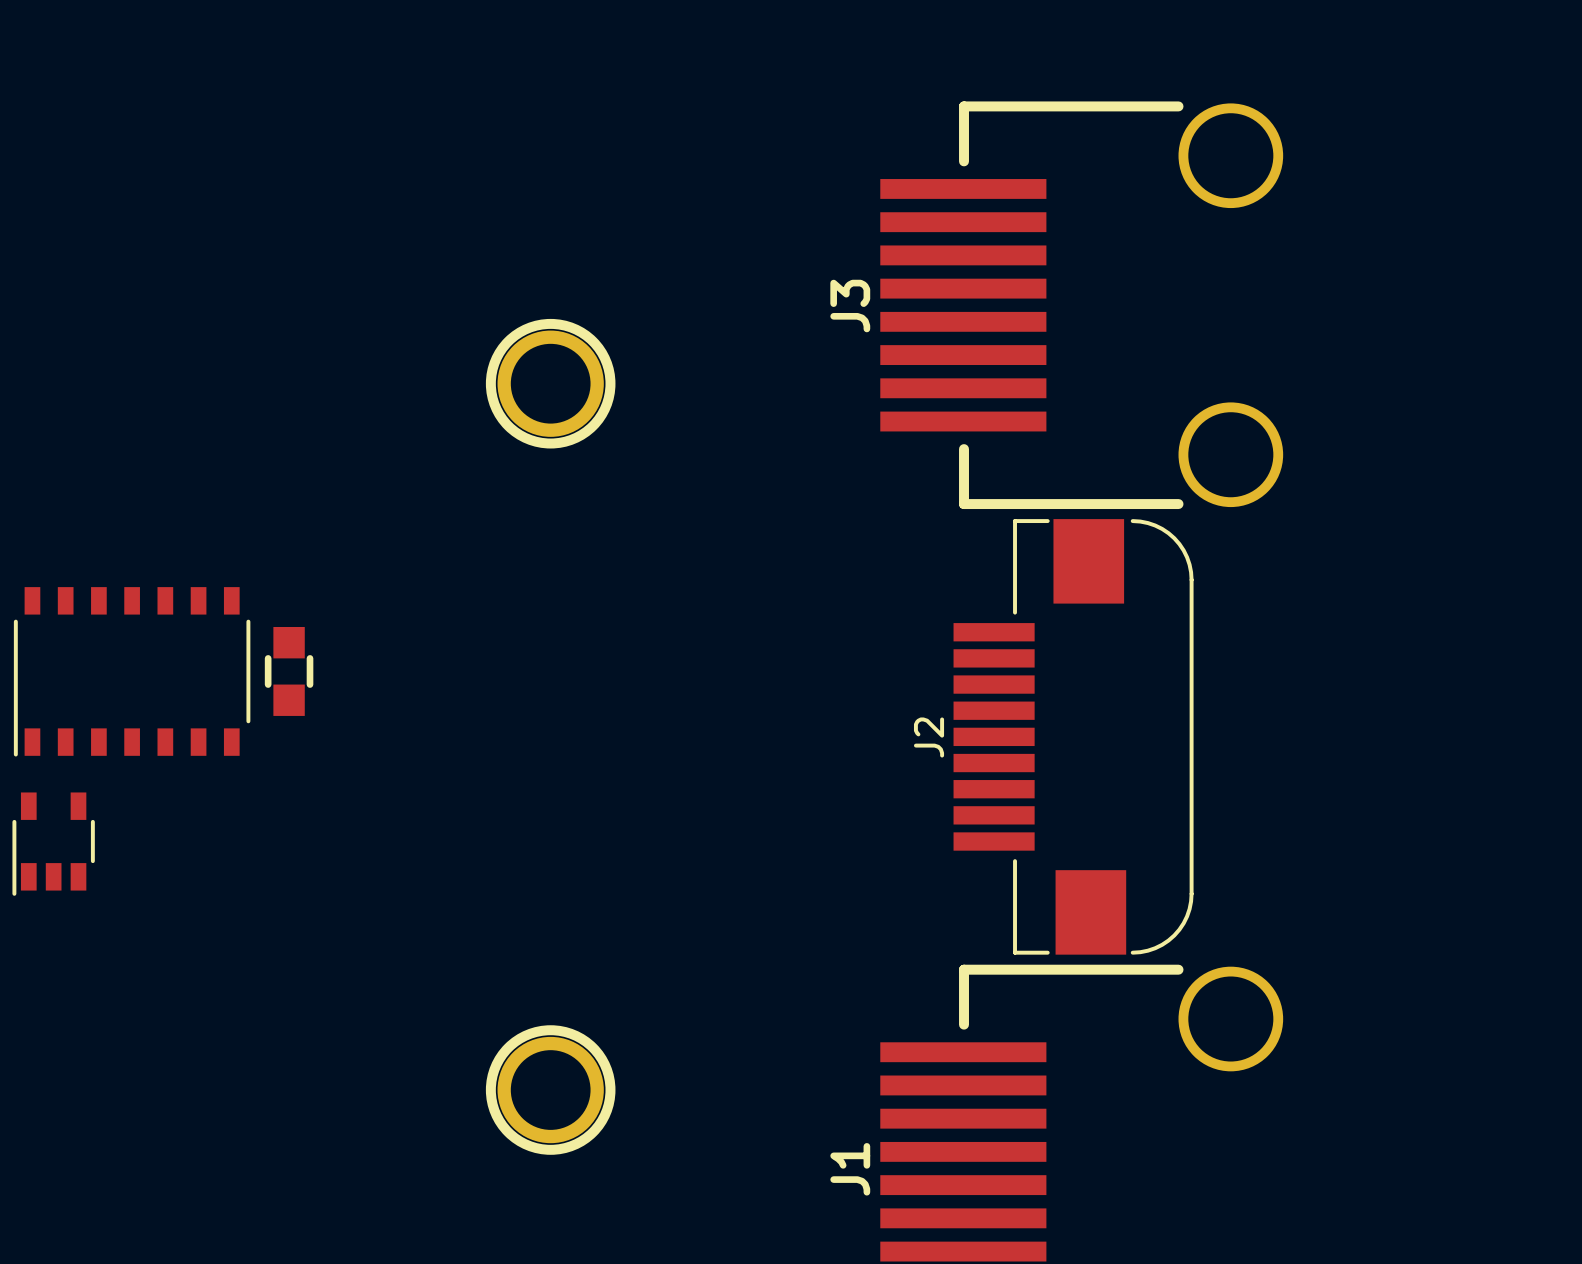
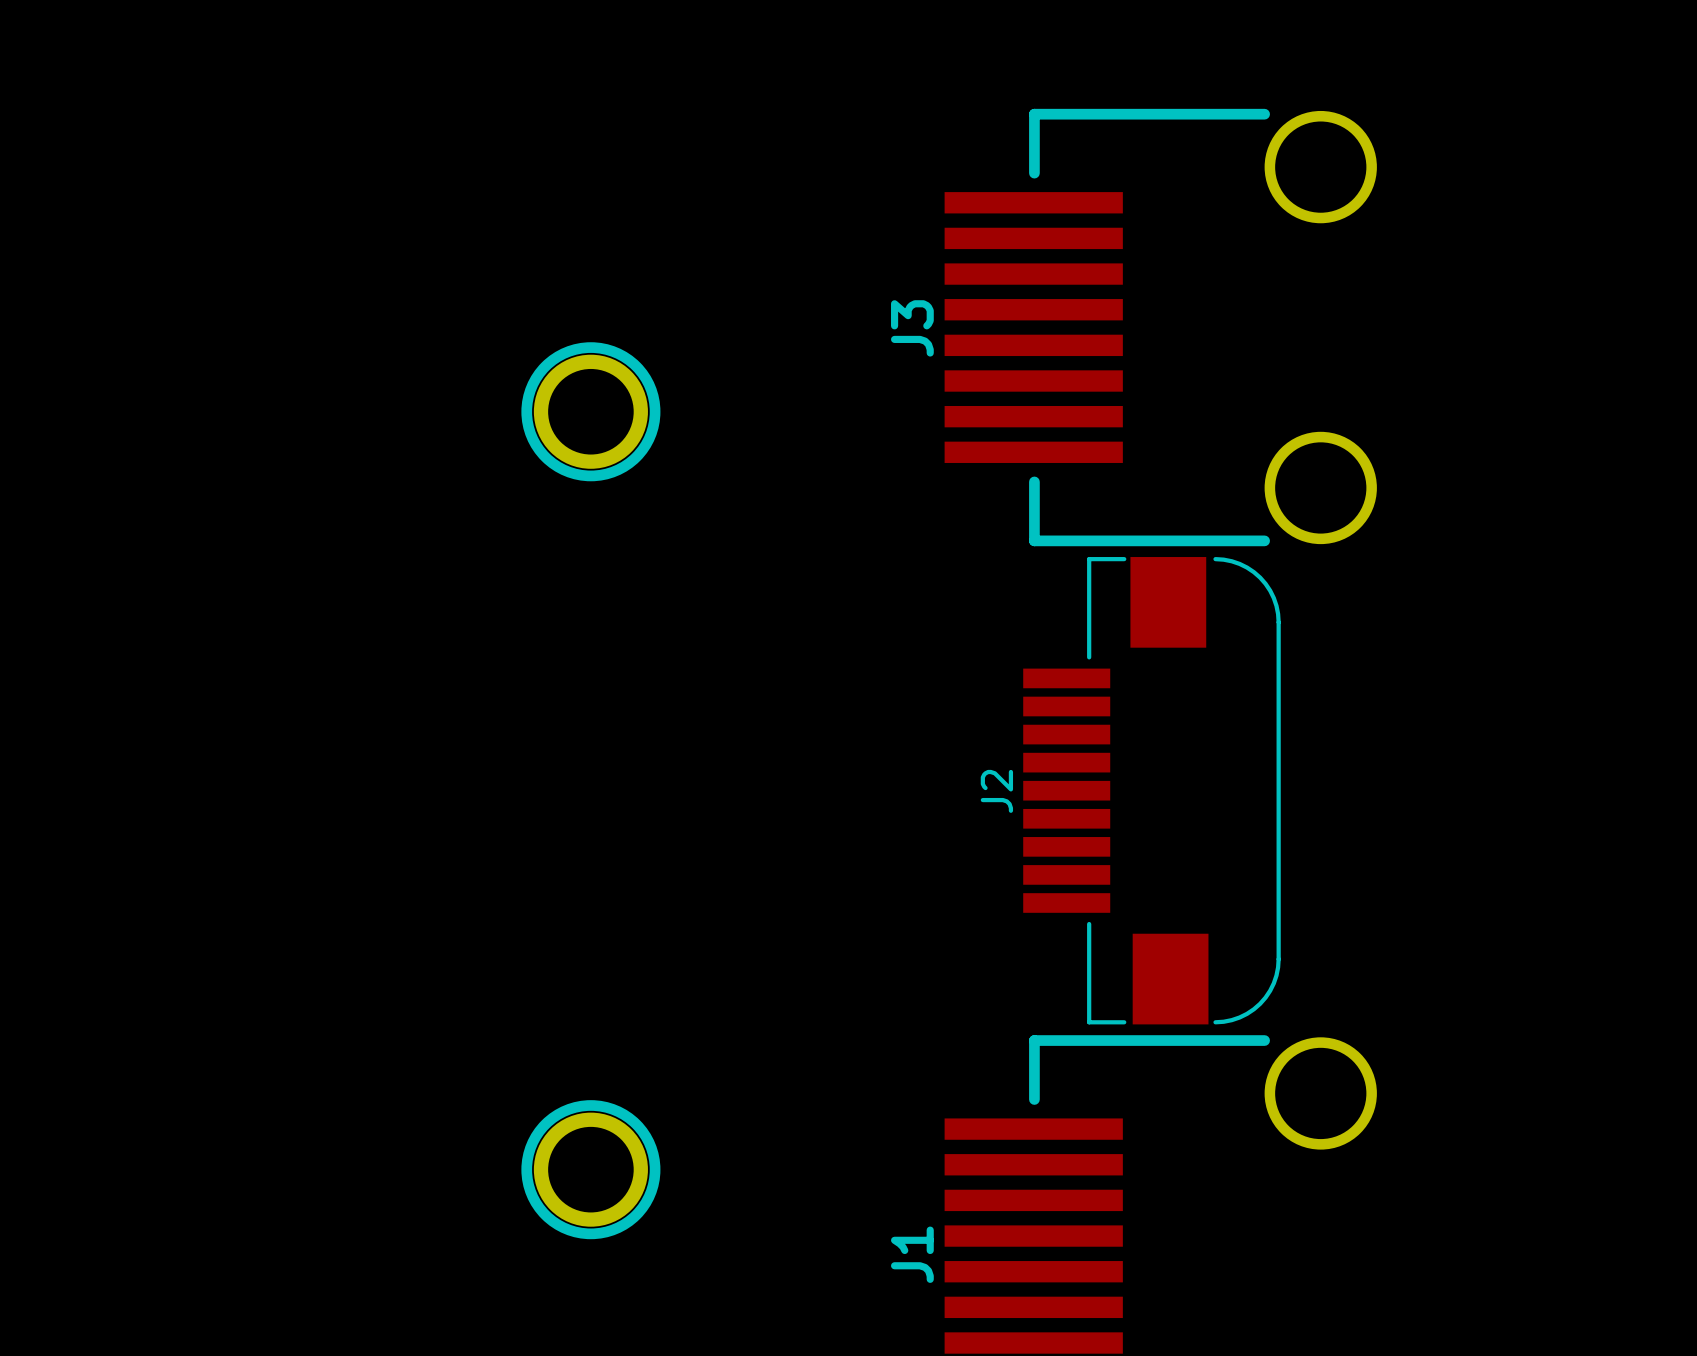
part: (132, 671) -> none
part: (289, 671) -> none
part: (53, 844) -> none

